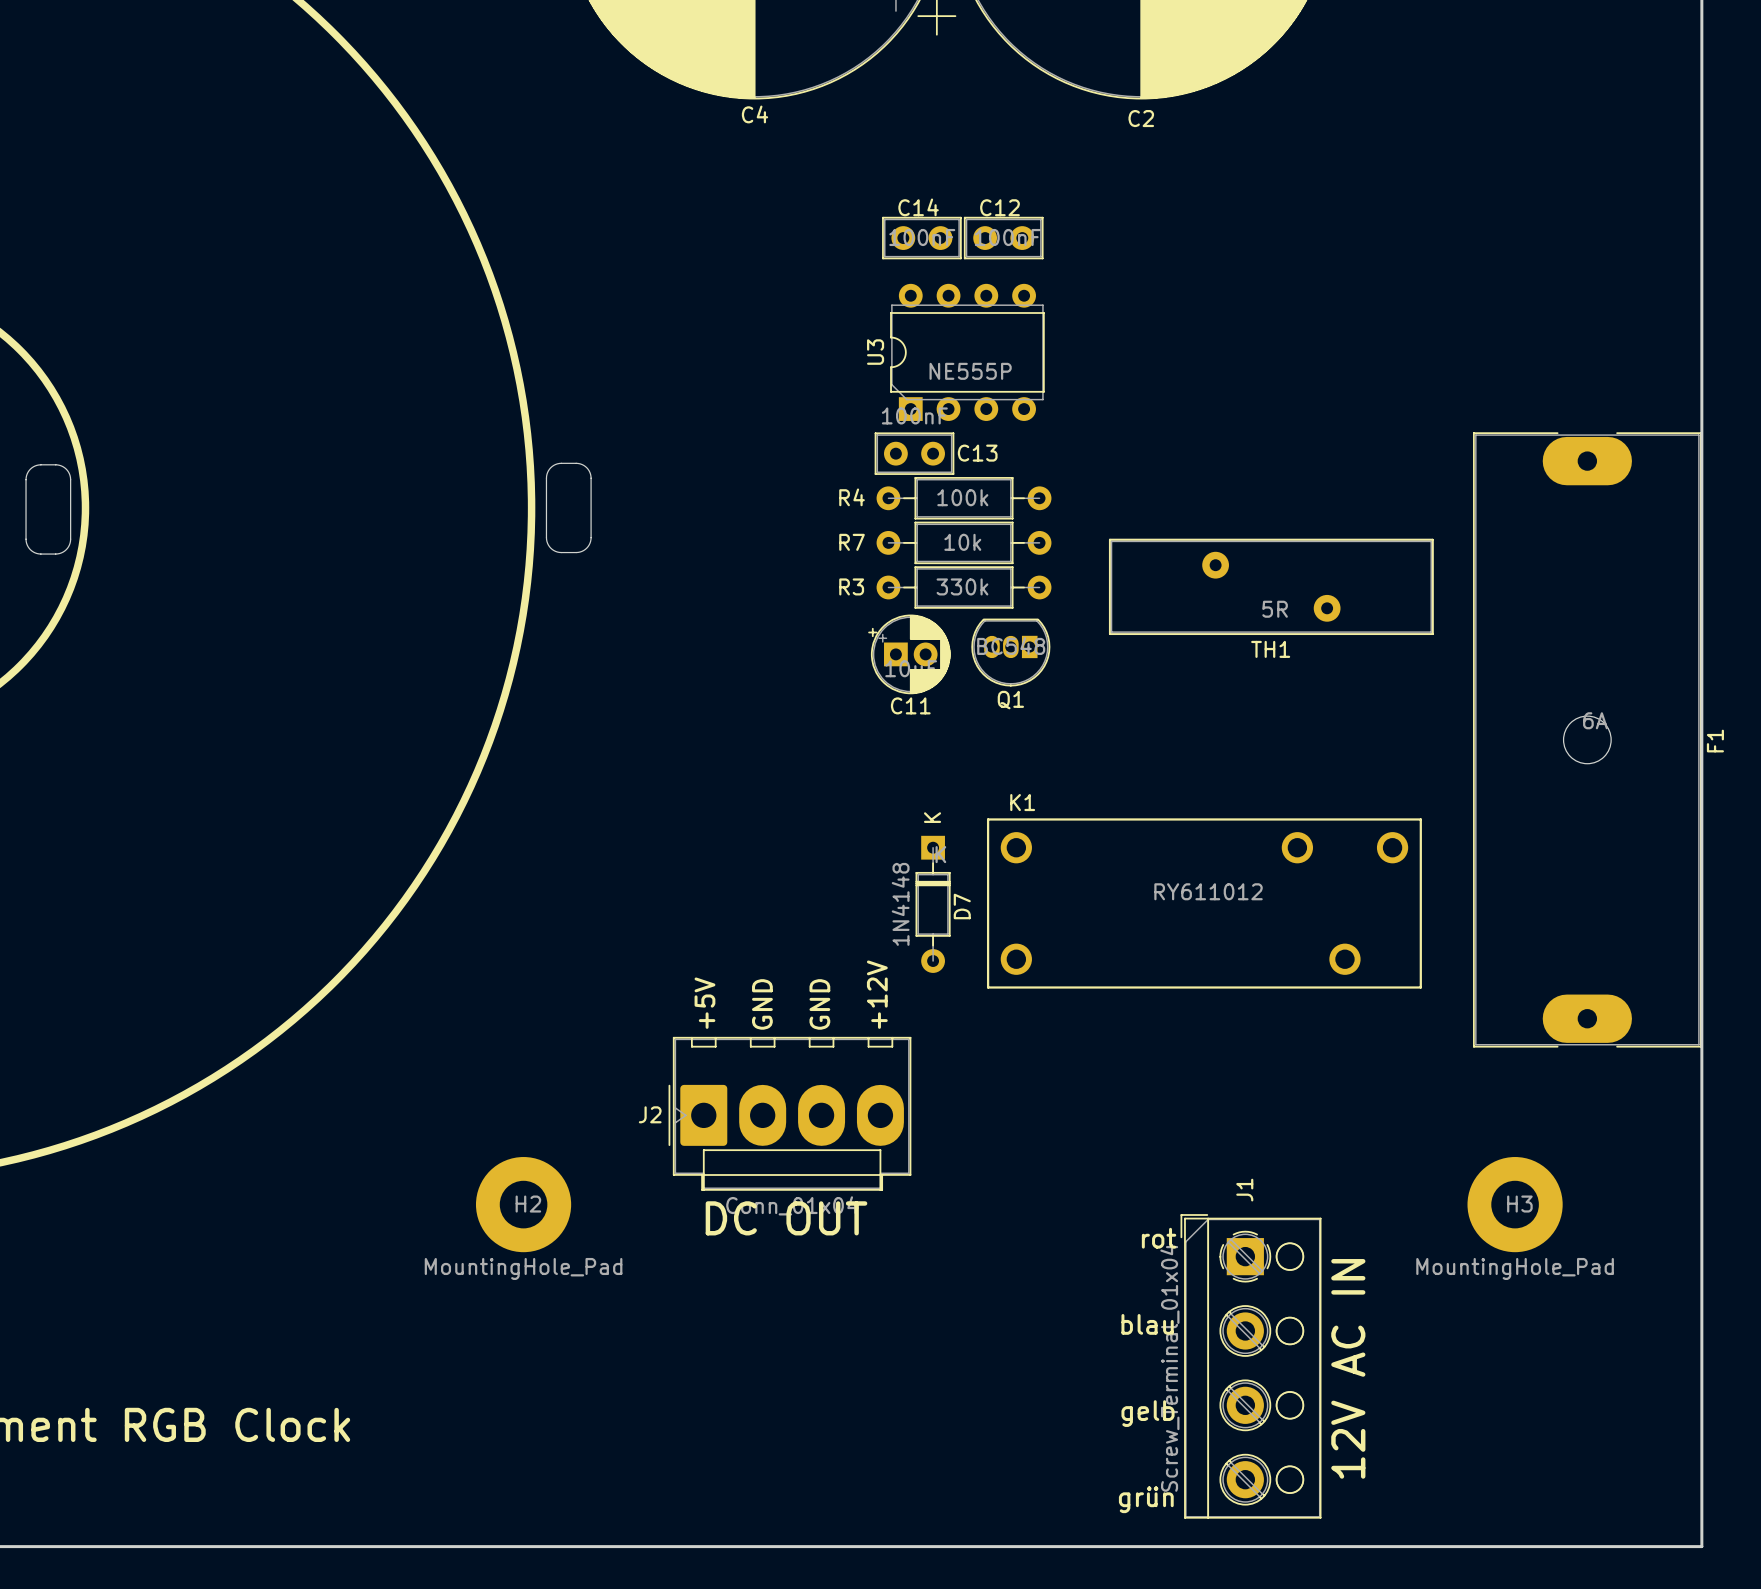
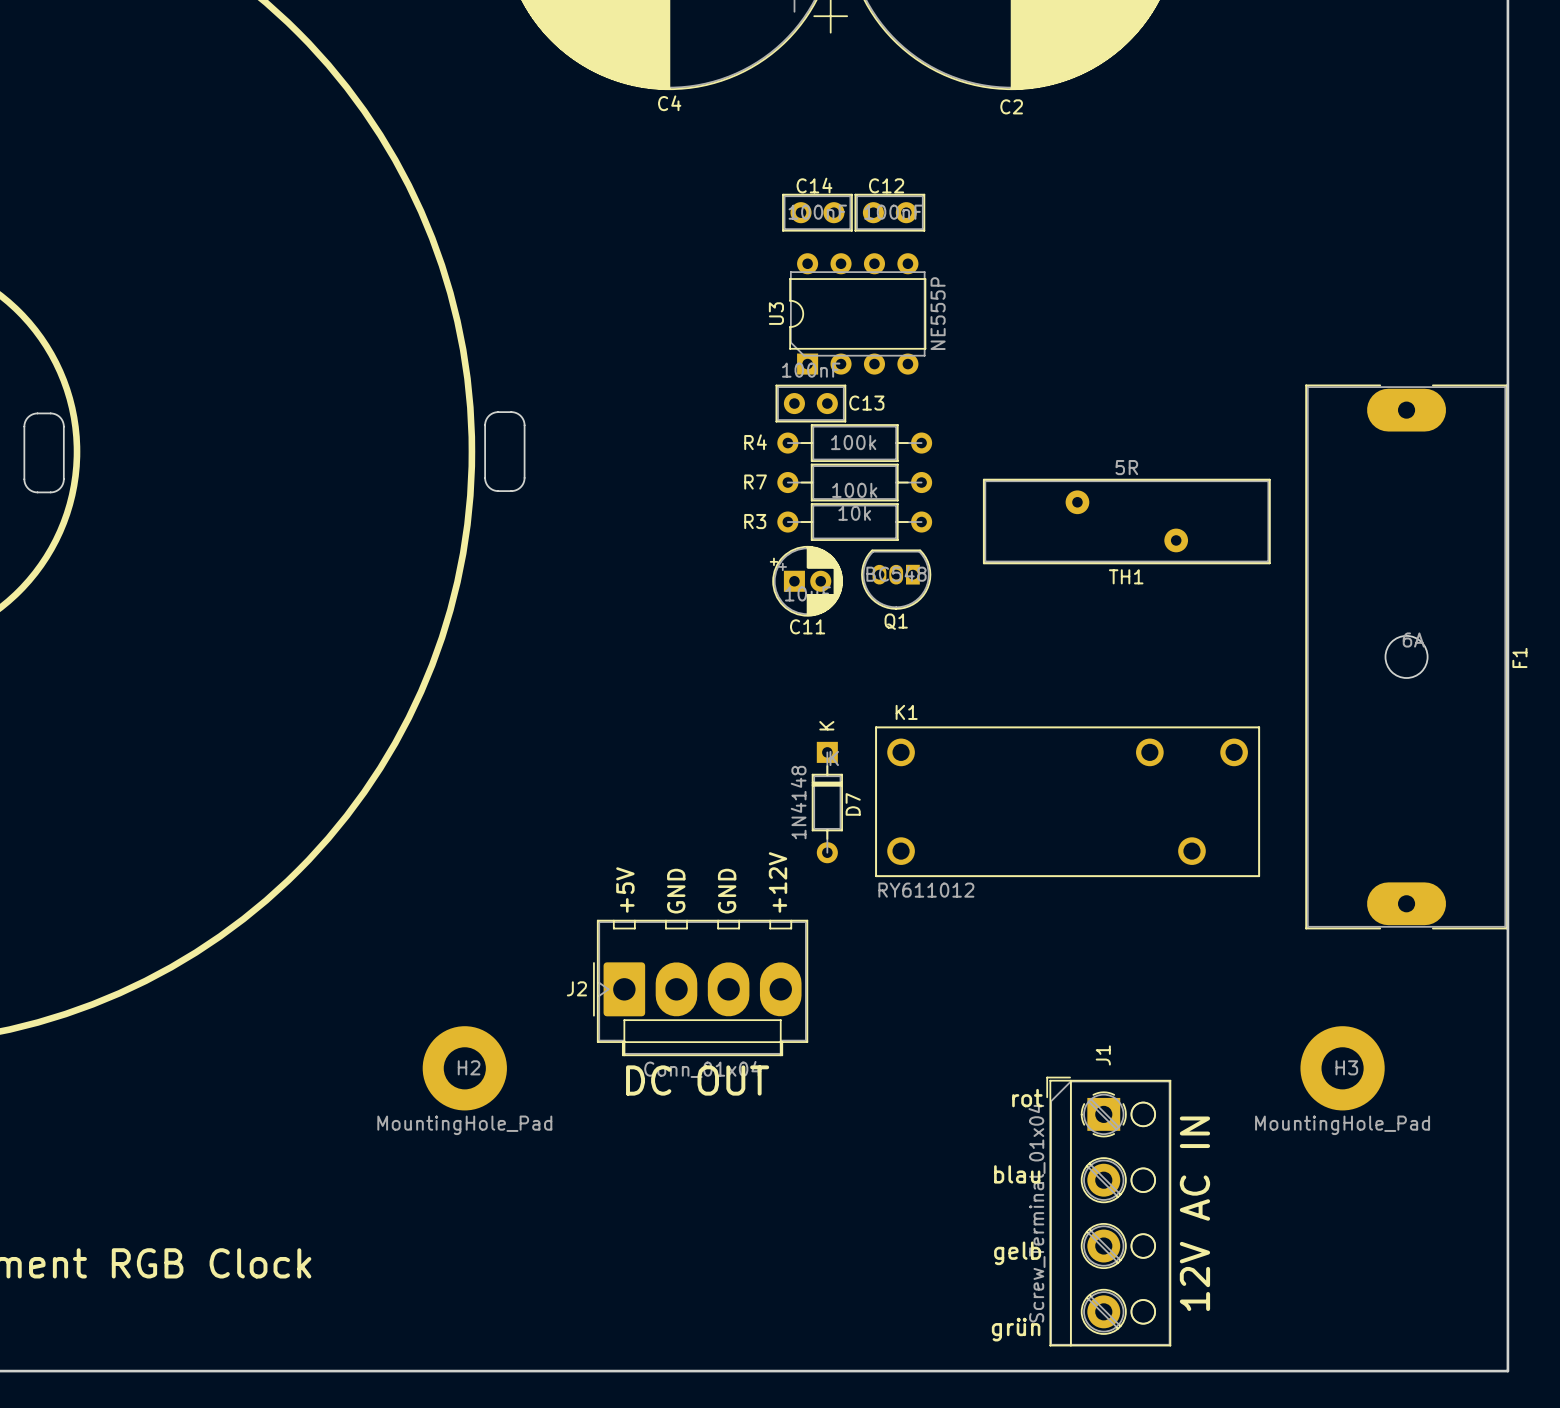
U3 value rotation: 0° (970, 371) -> 90° counterclockwise (938, 313)
R7 value position: 10k (962, 542) -> 10k (854, 513)
R3 value: 330k (962, 586) -> 100k (854, 490)
TH1 value position: 5R (1275, 609) -> 5R (1126, 467)
K1 value position: RY611012 (1208, 891) -> RY611012 (926, 890)

